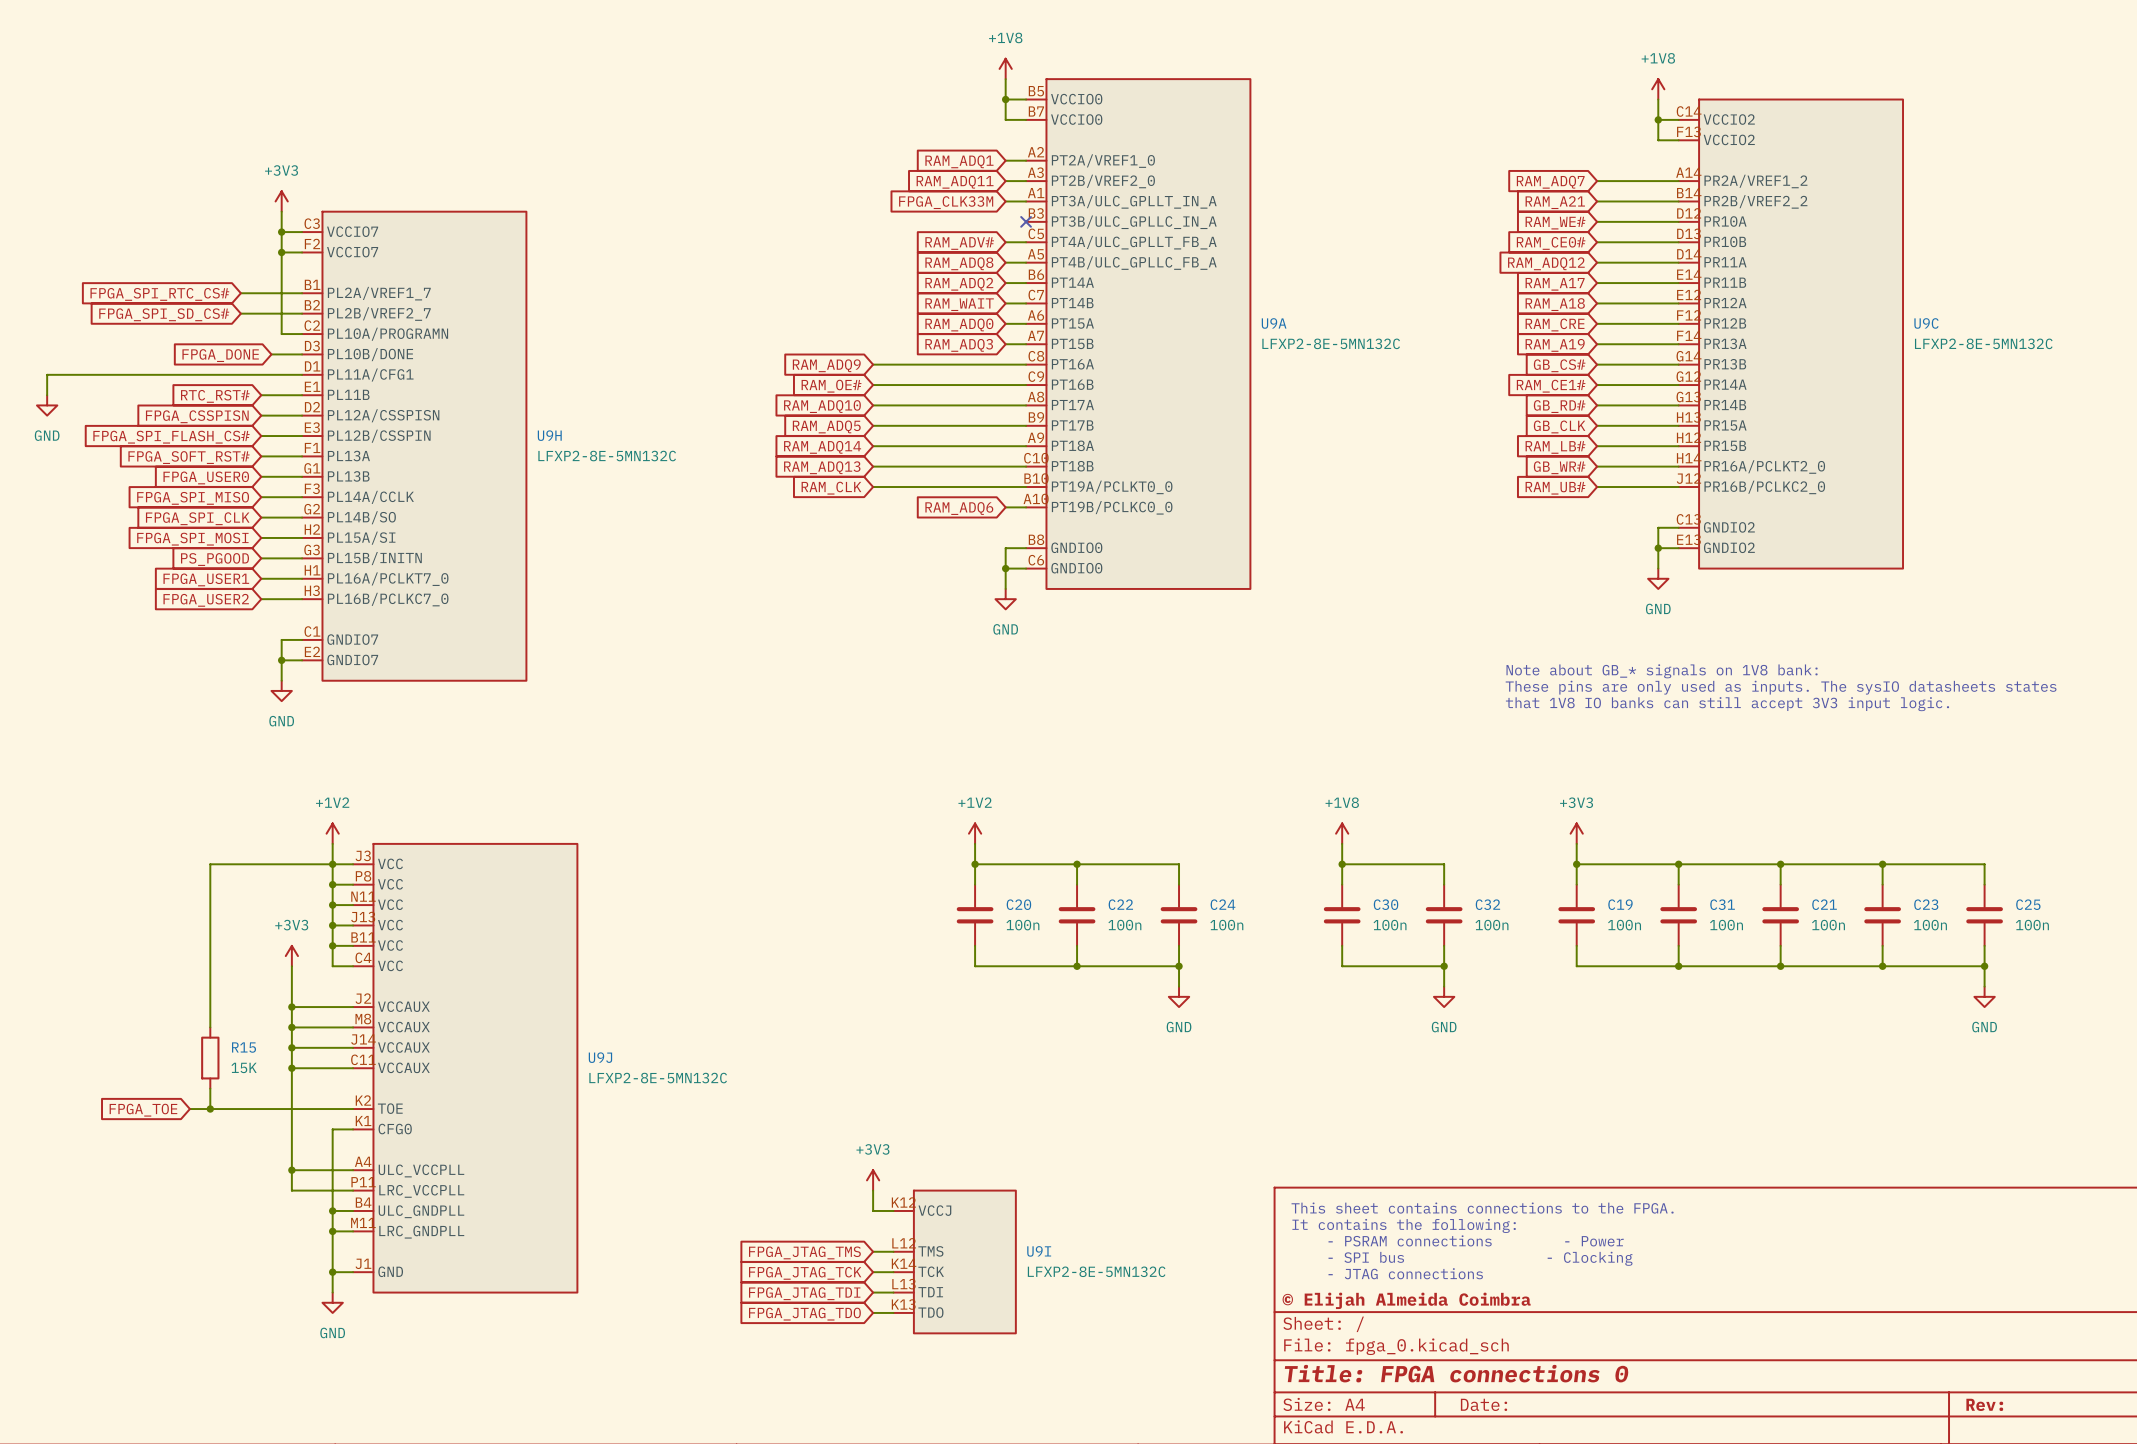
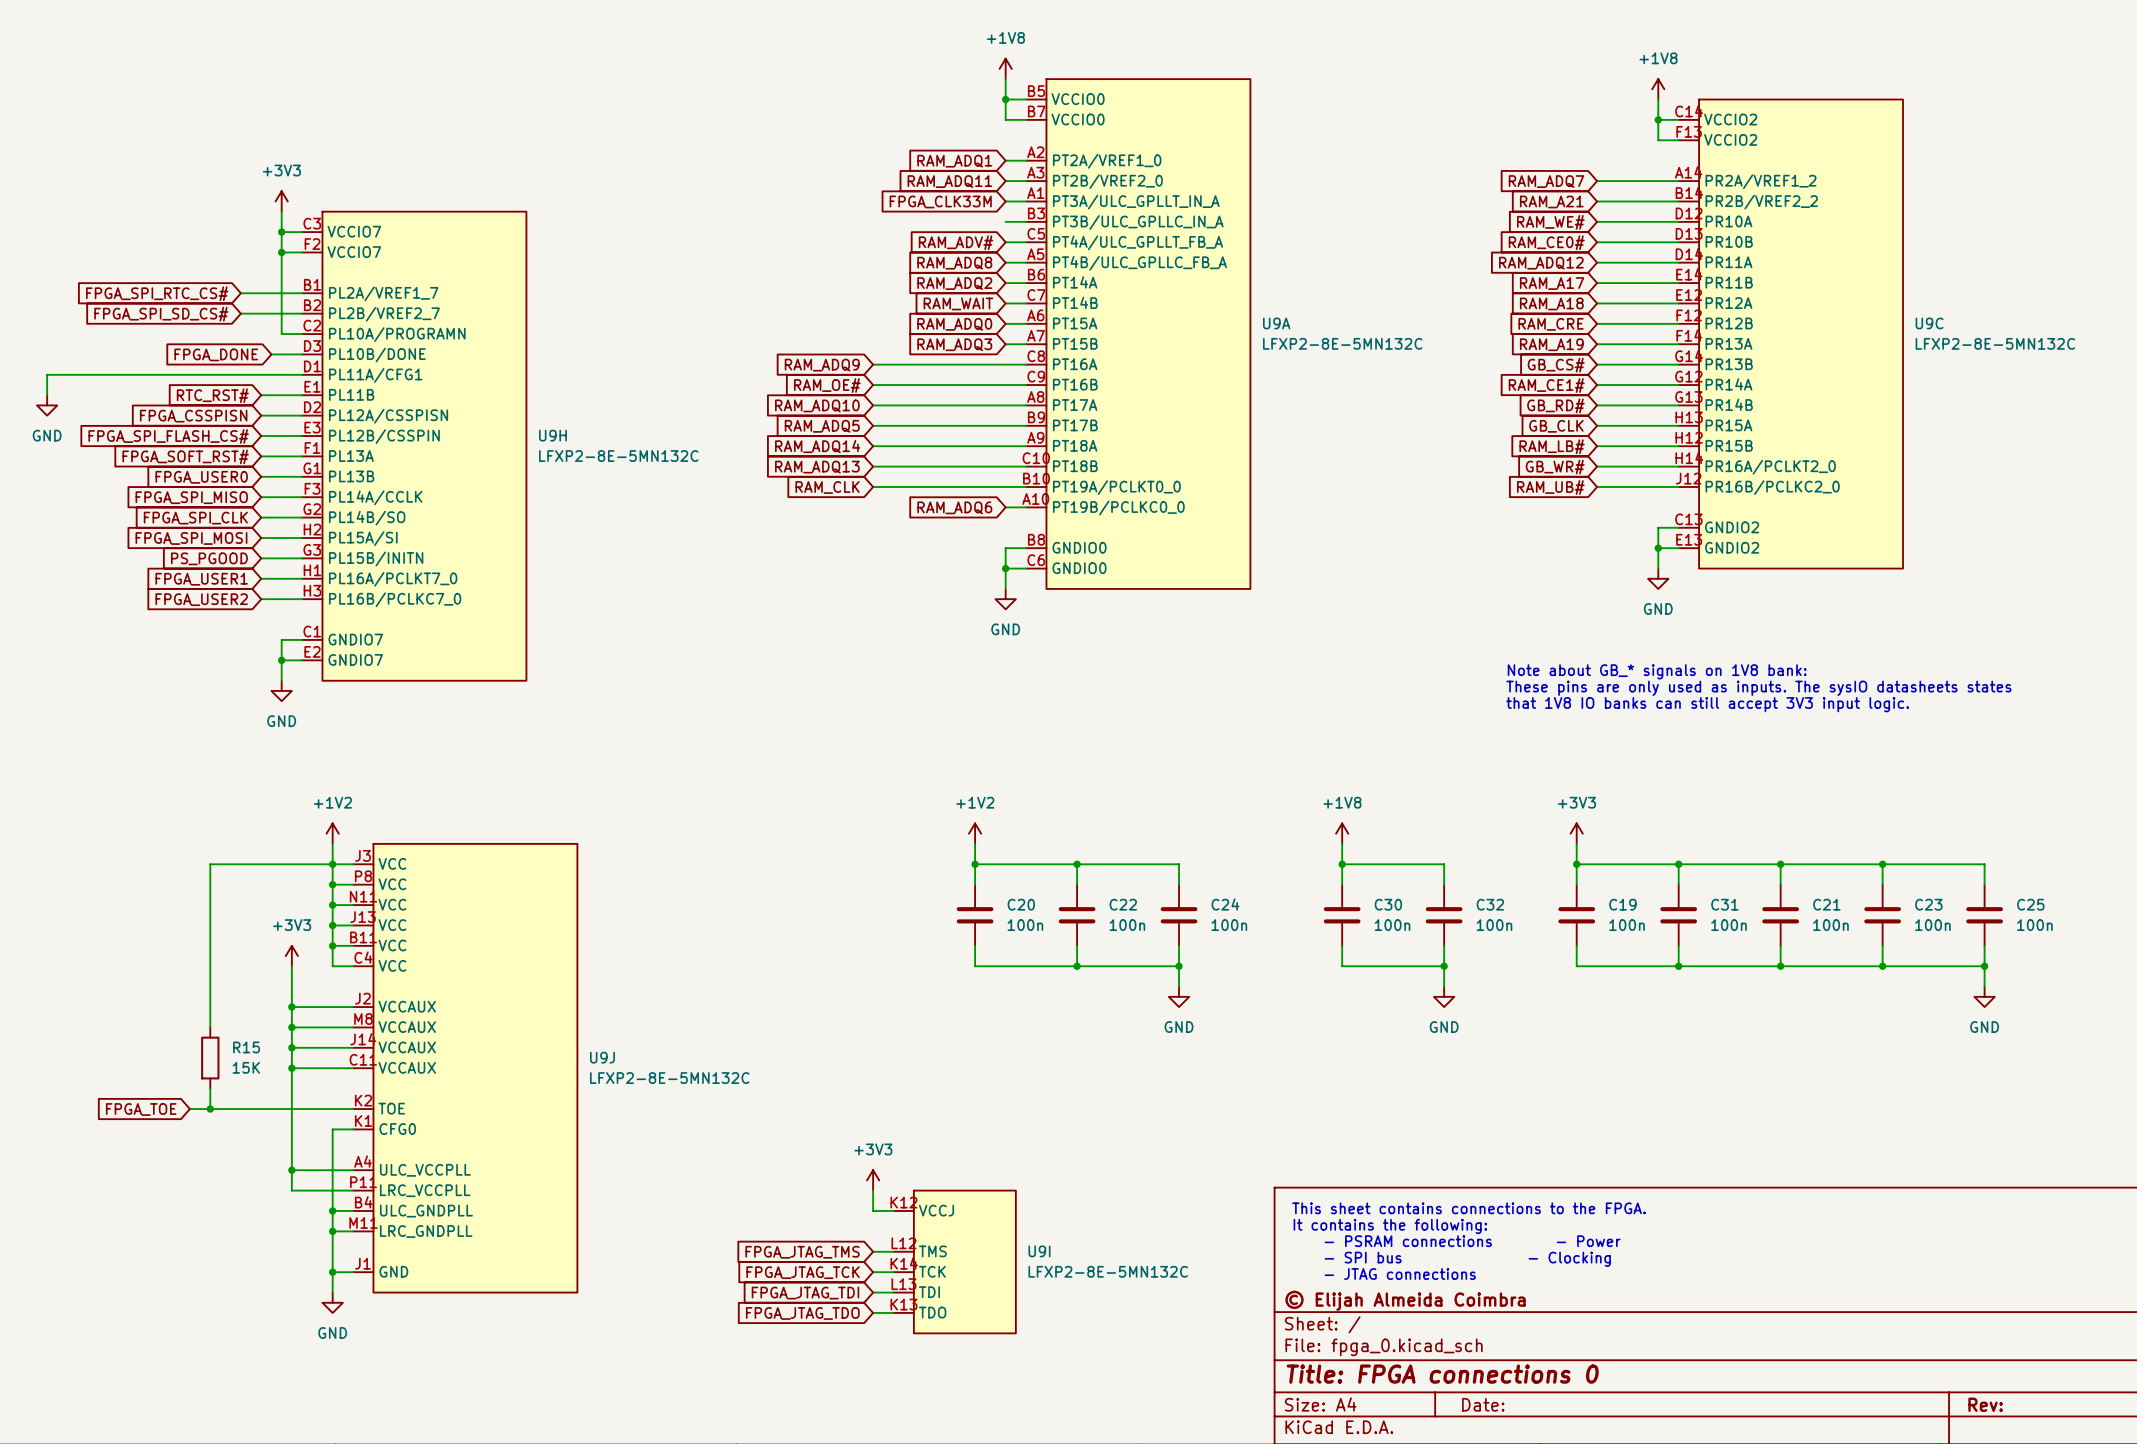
wire: none -> (1005, 221) (1026, 221)
no-connect mark: (1026, 221) -> none

